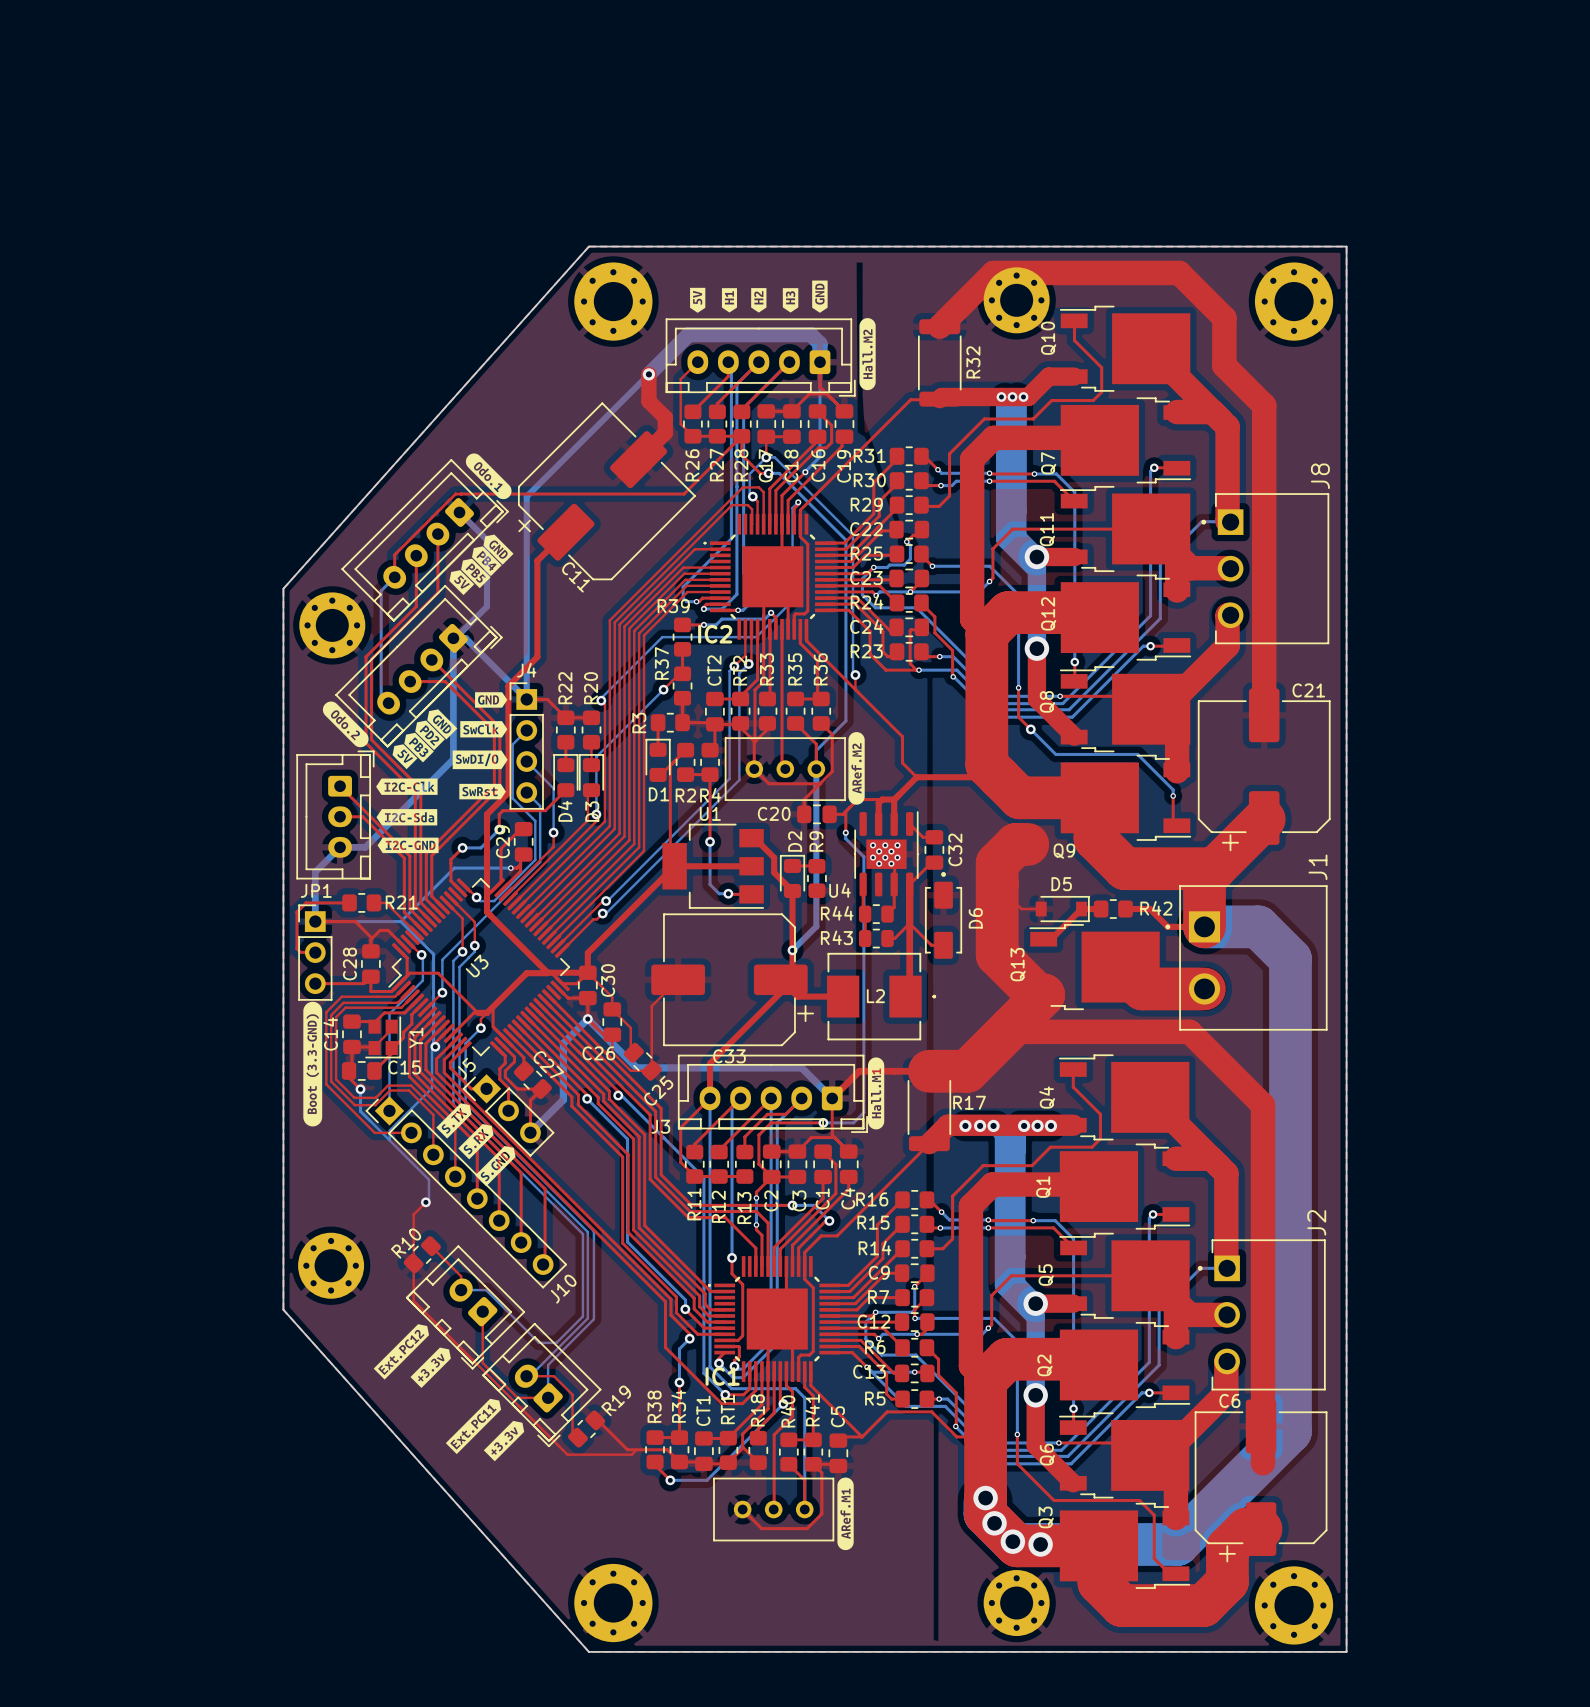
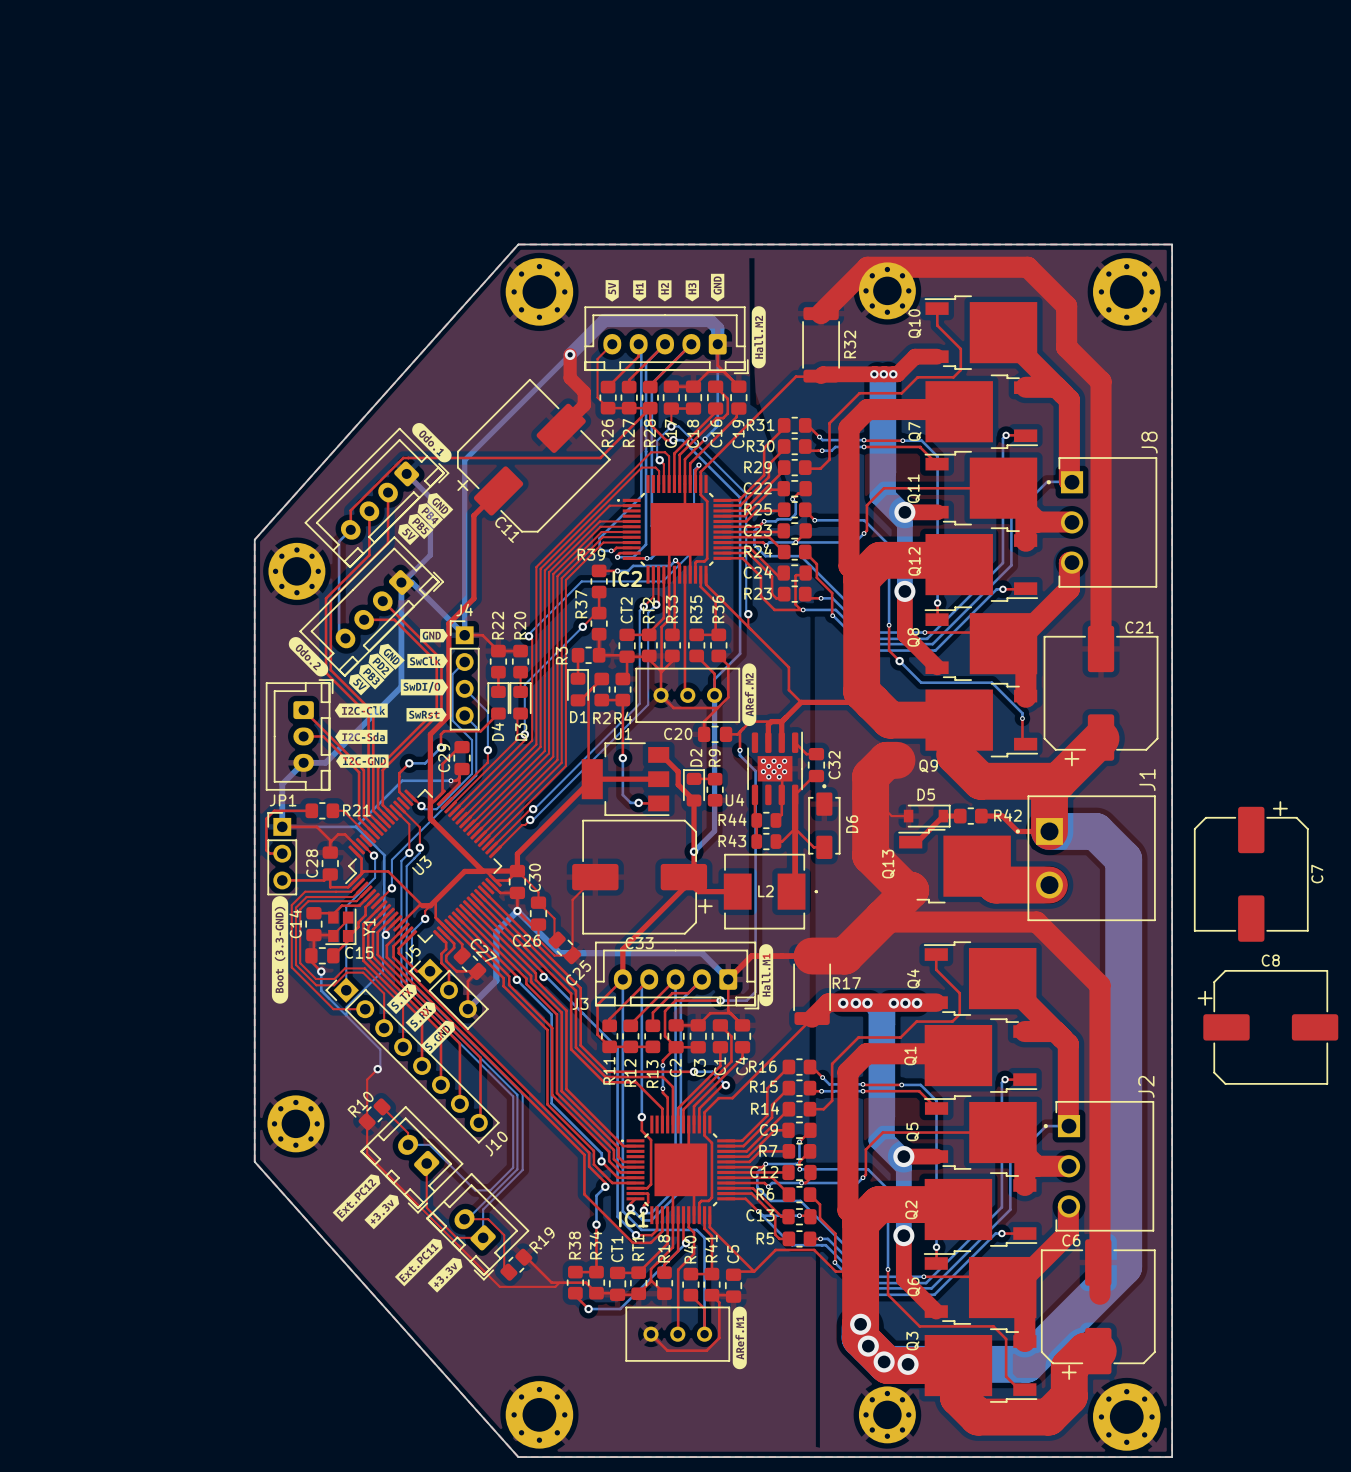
C7: none -> (1251, 871)
C8: none -> (1268, 1027)

